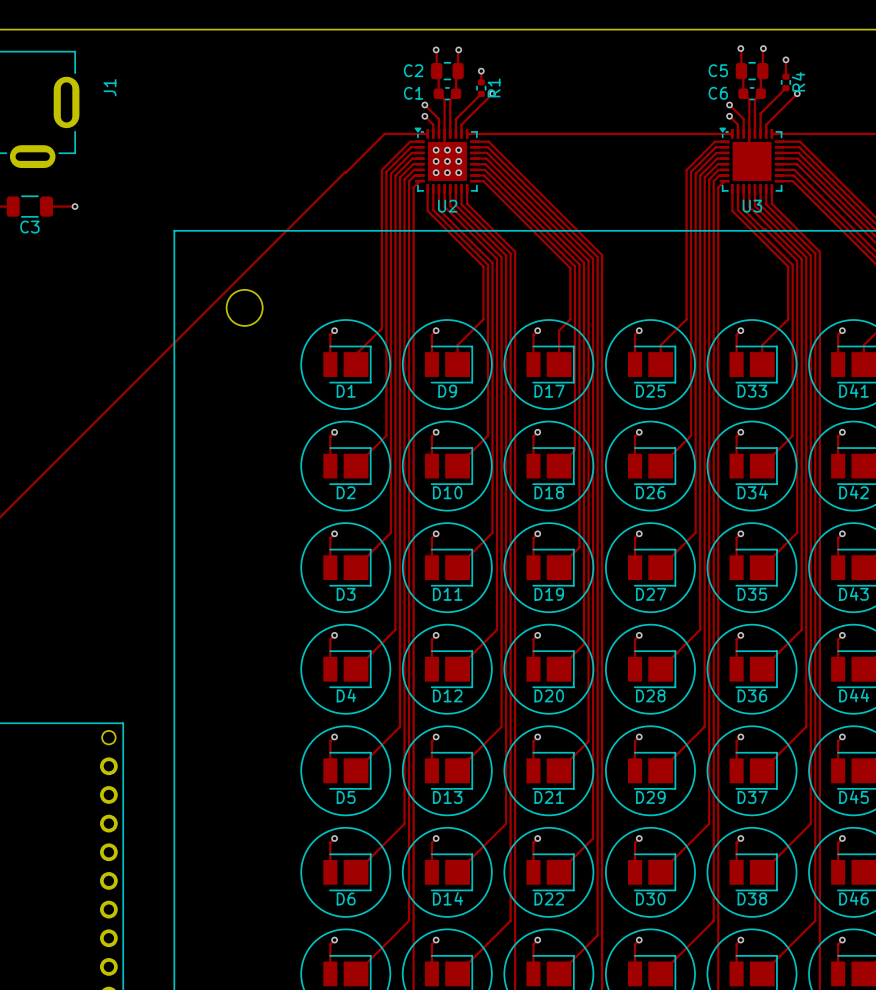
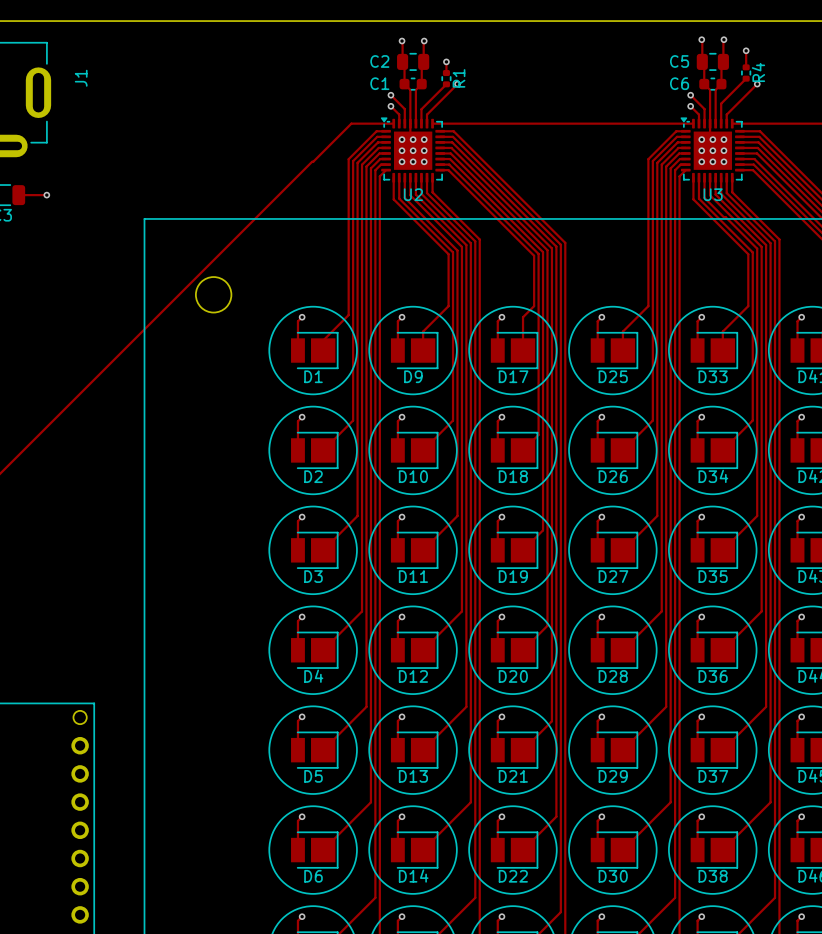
via: none -> (701, 139)
via: none -> (712, 139)
via: none -> (723, 139)
via: none -> (701, 150)
via: none -> (712, 150)
via: none -> (723, 150)
via: none -> (701, 161)
via: none -> (712, 161)
via: none -> (723, 161)

